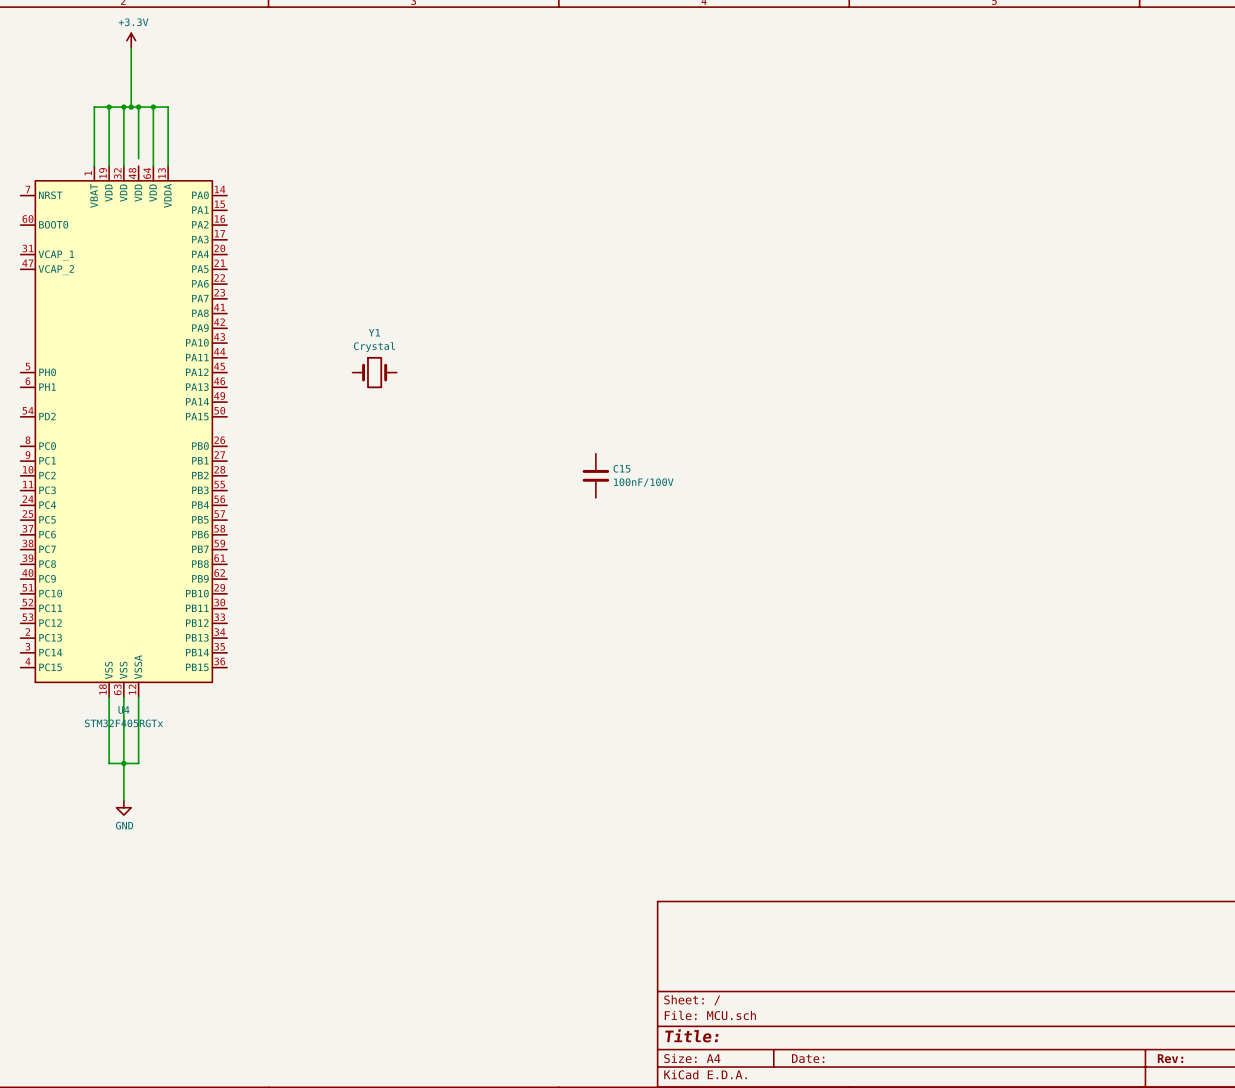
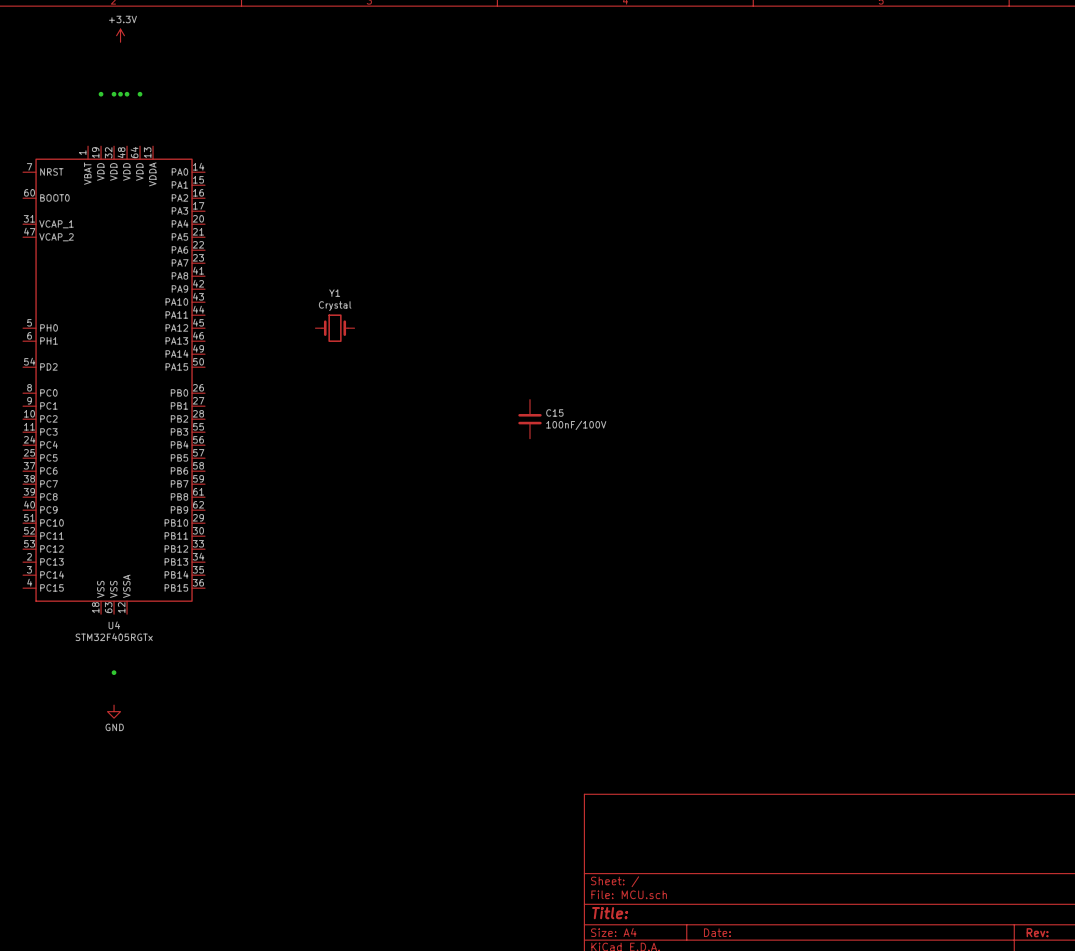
wire: (131, 48) (131, 107) -> none
wire: (109, 107) (109, 166) -> none
wire: (123, 107) (123, 166) -> none
wire: (138, 107) (138, 158) -> none
wire: (153, 107) (153, 166) -> none
wire: (94, 166) (94, 107) (168, 107) (168, 166) -> none
wire: (109, 697) (109, 763) (138, 763) (138, 697) -> none
wire: (123, 697) (123, 800) -> none

